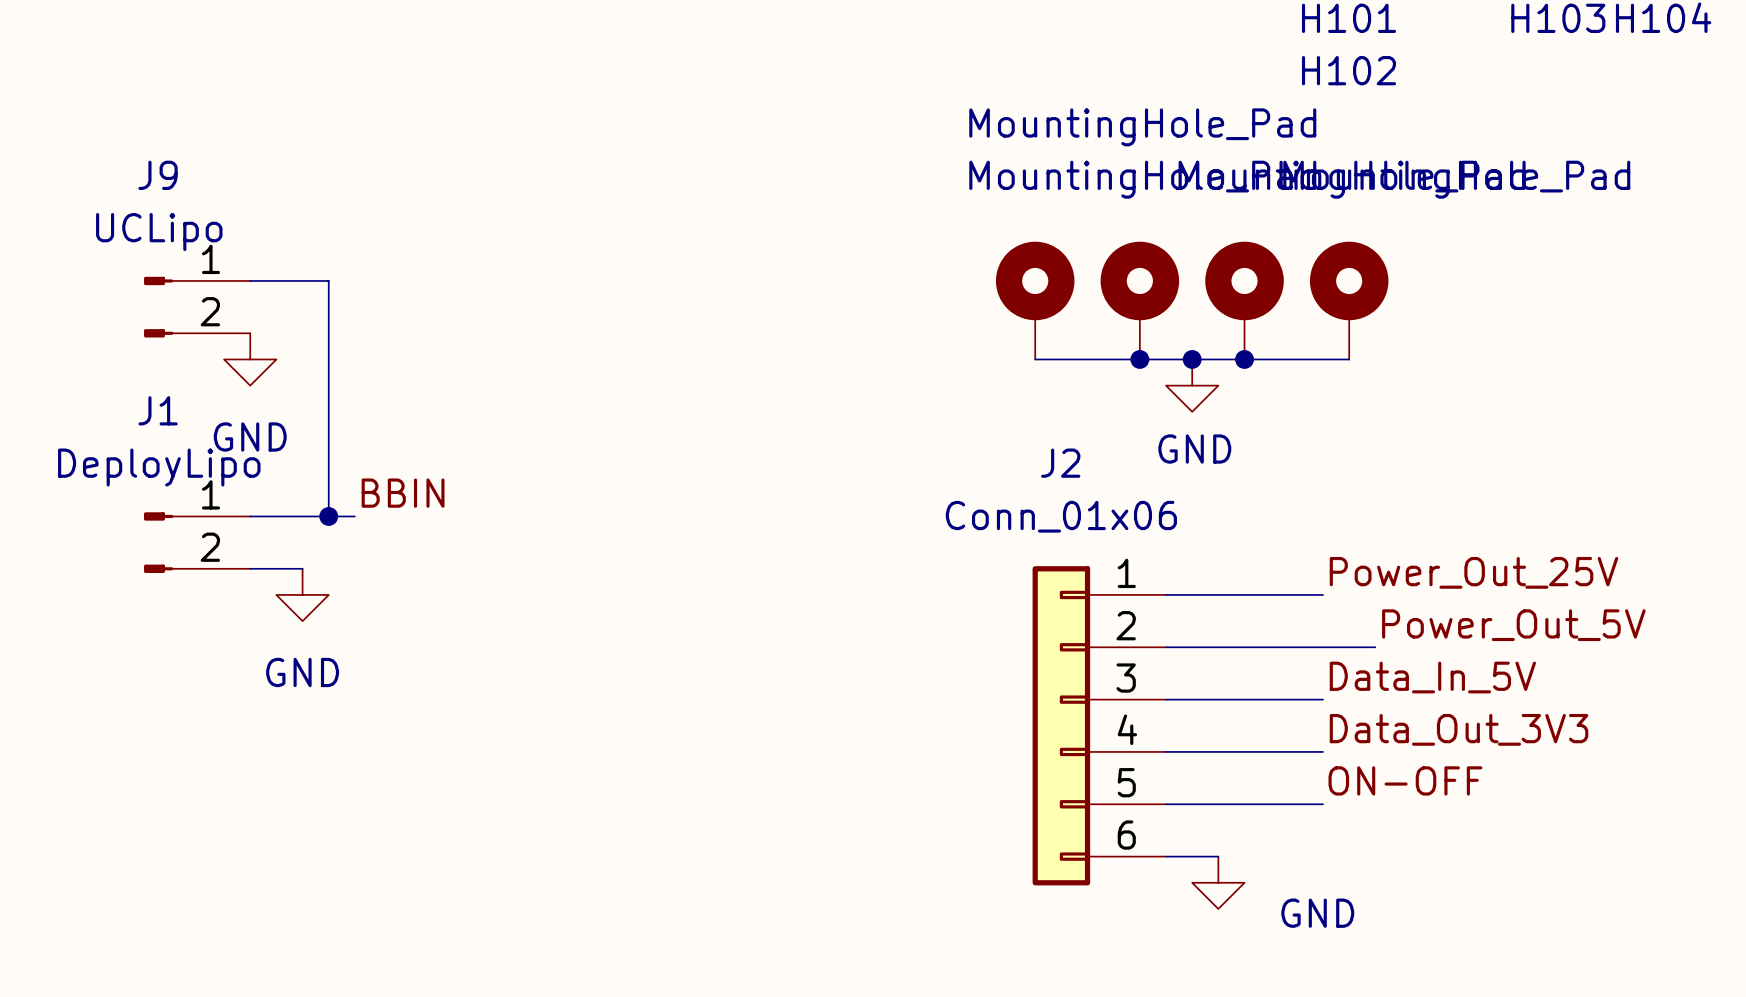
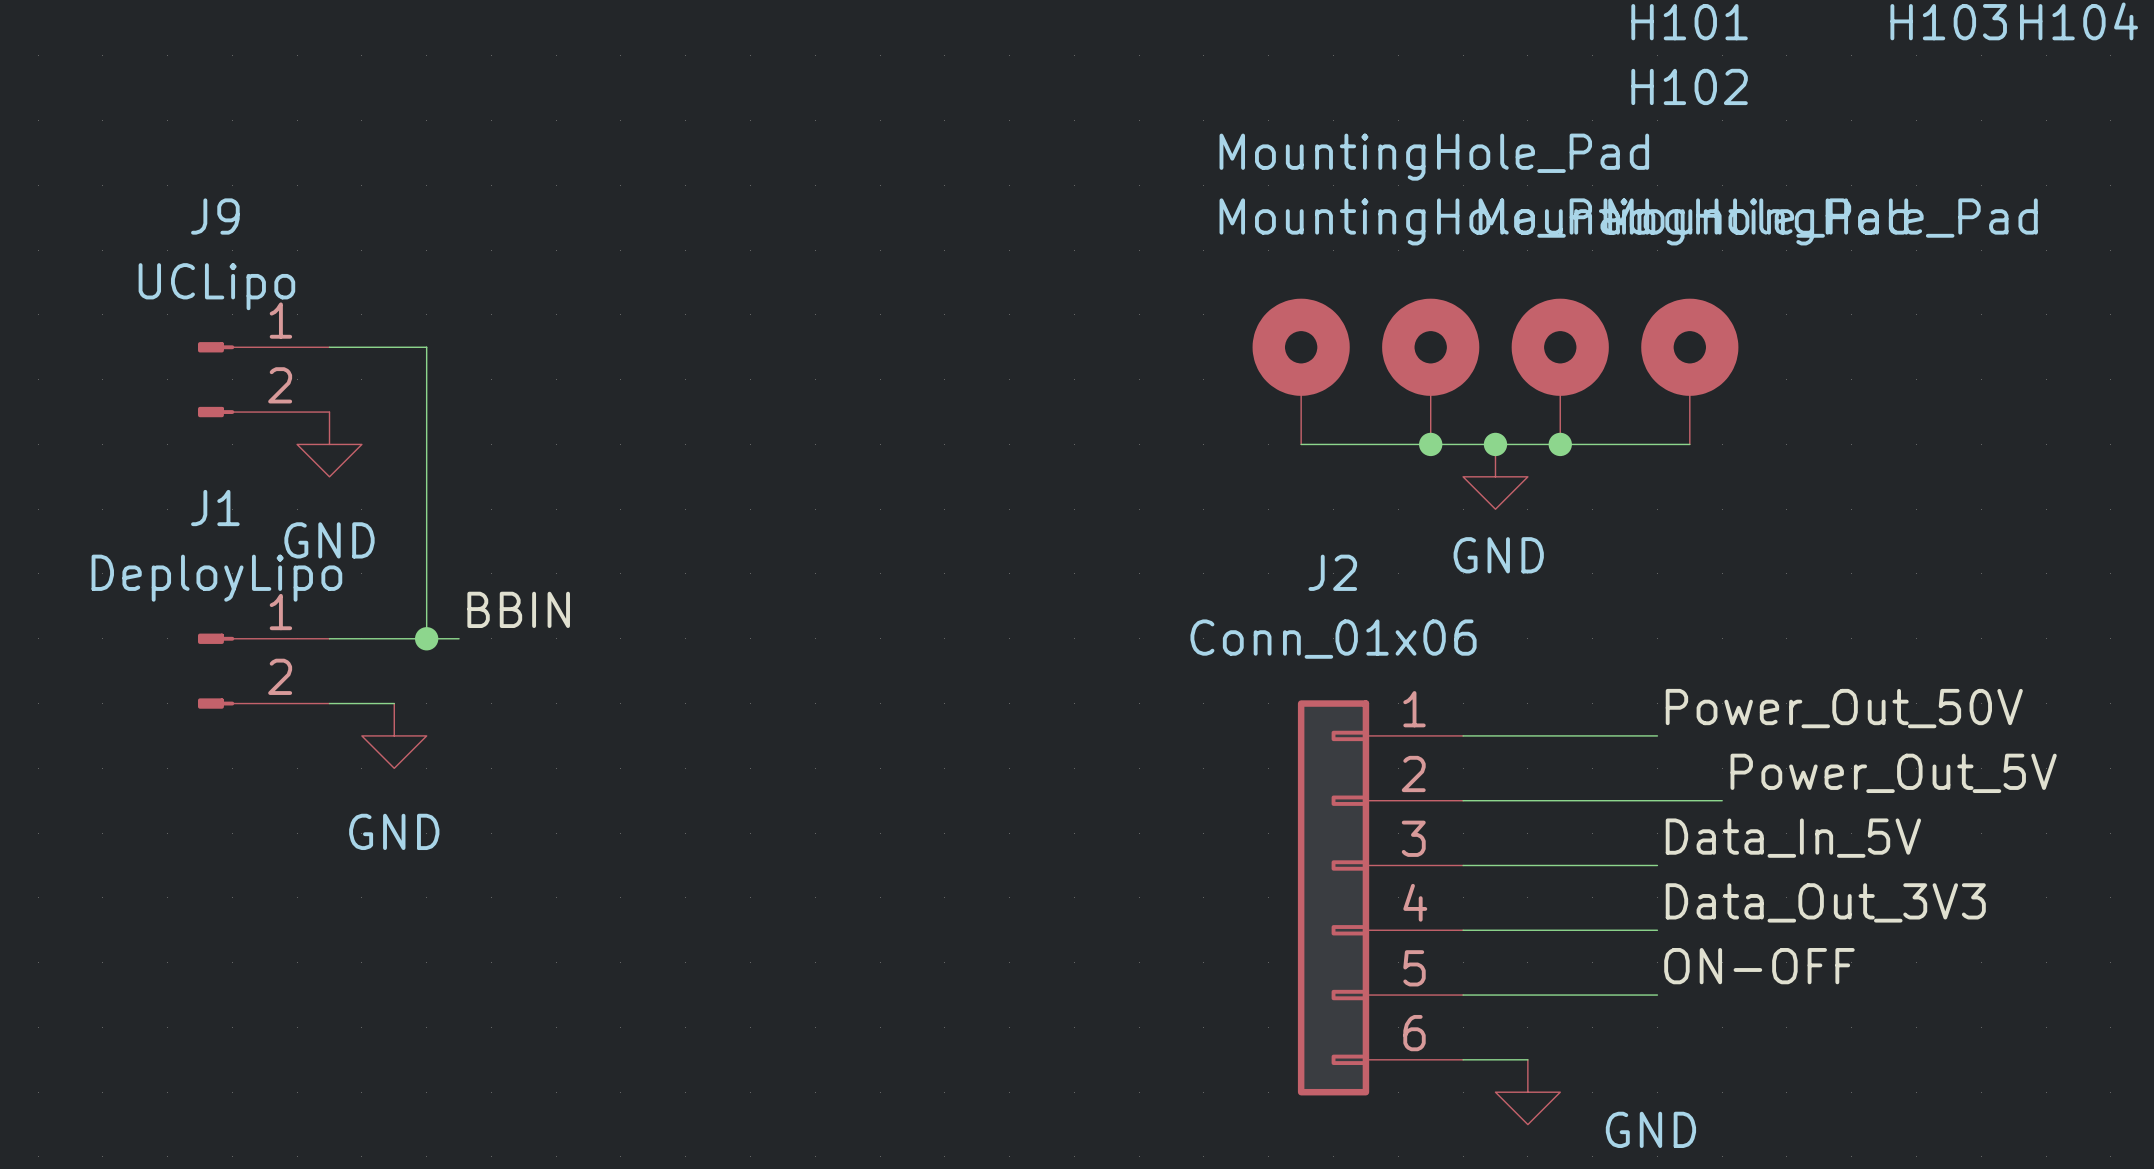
label: Power_Out_25V (1473, 572) -> Power_Out_50V (1844, 708)

